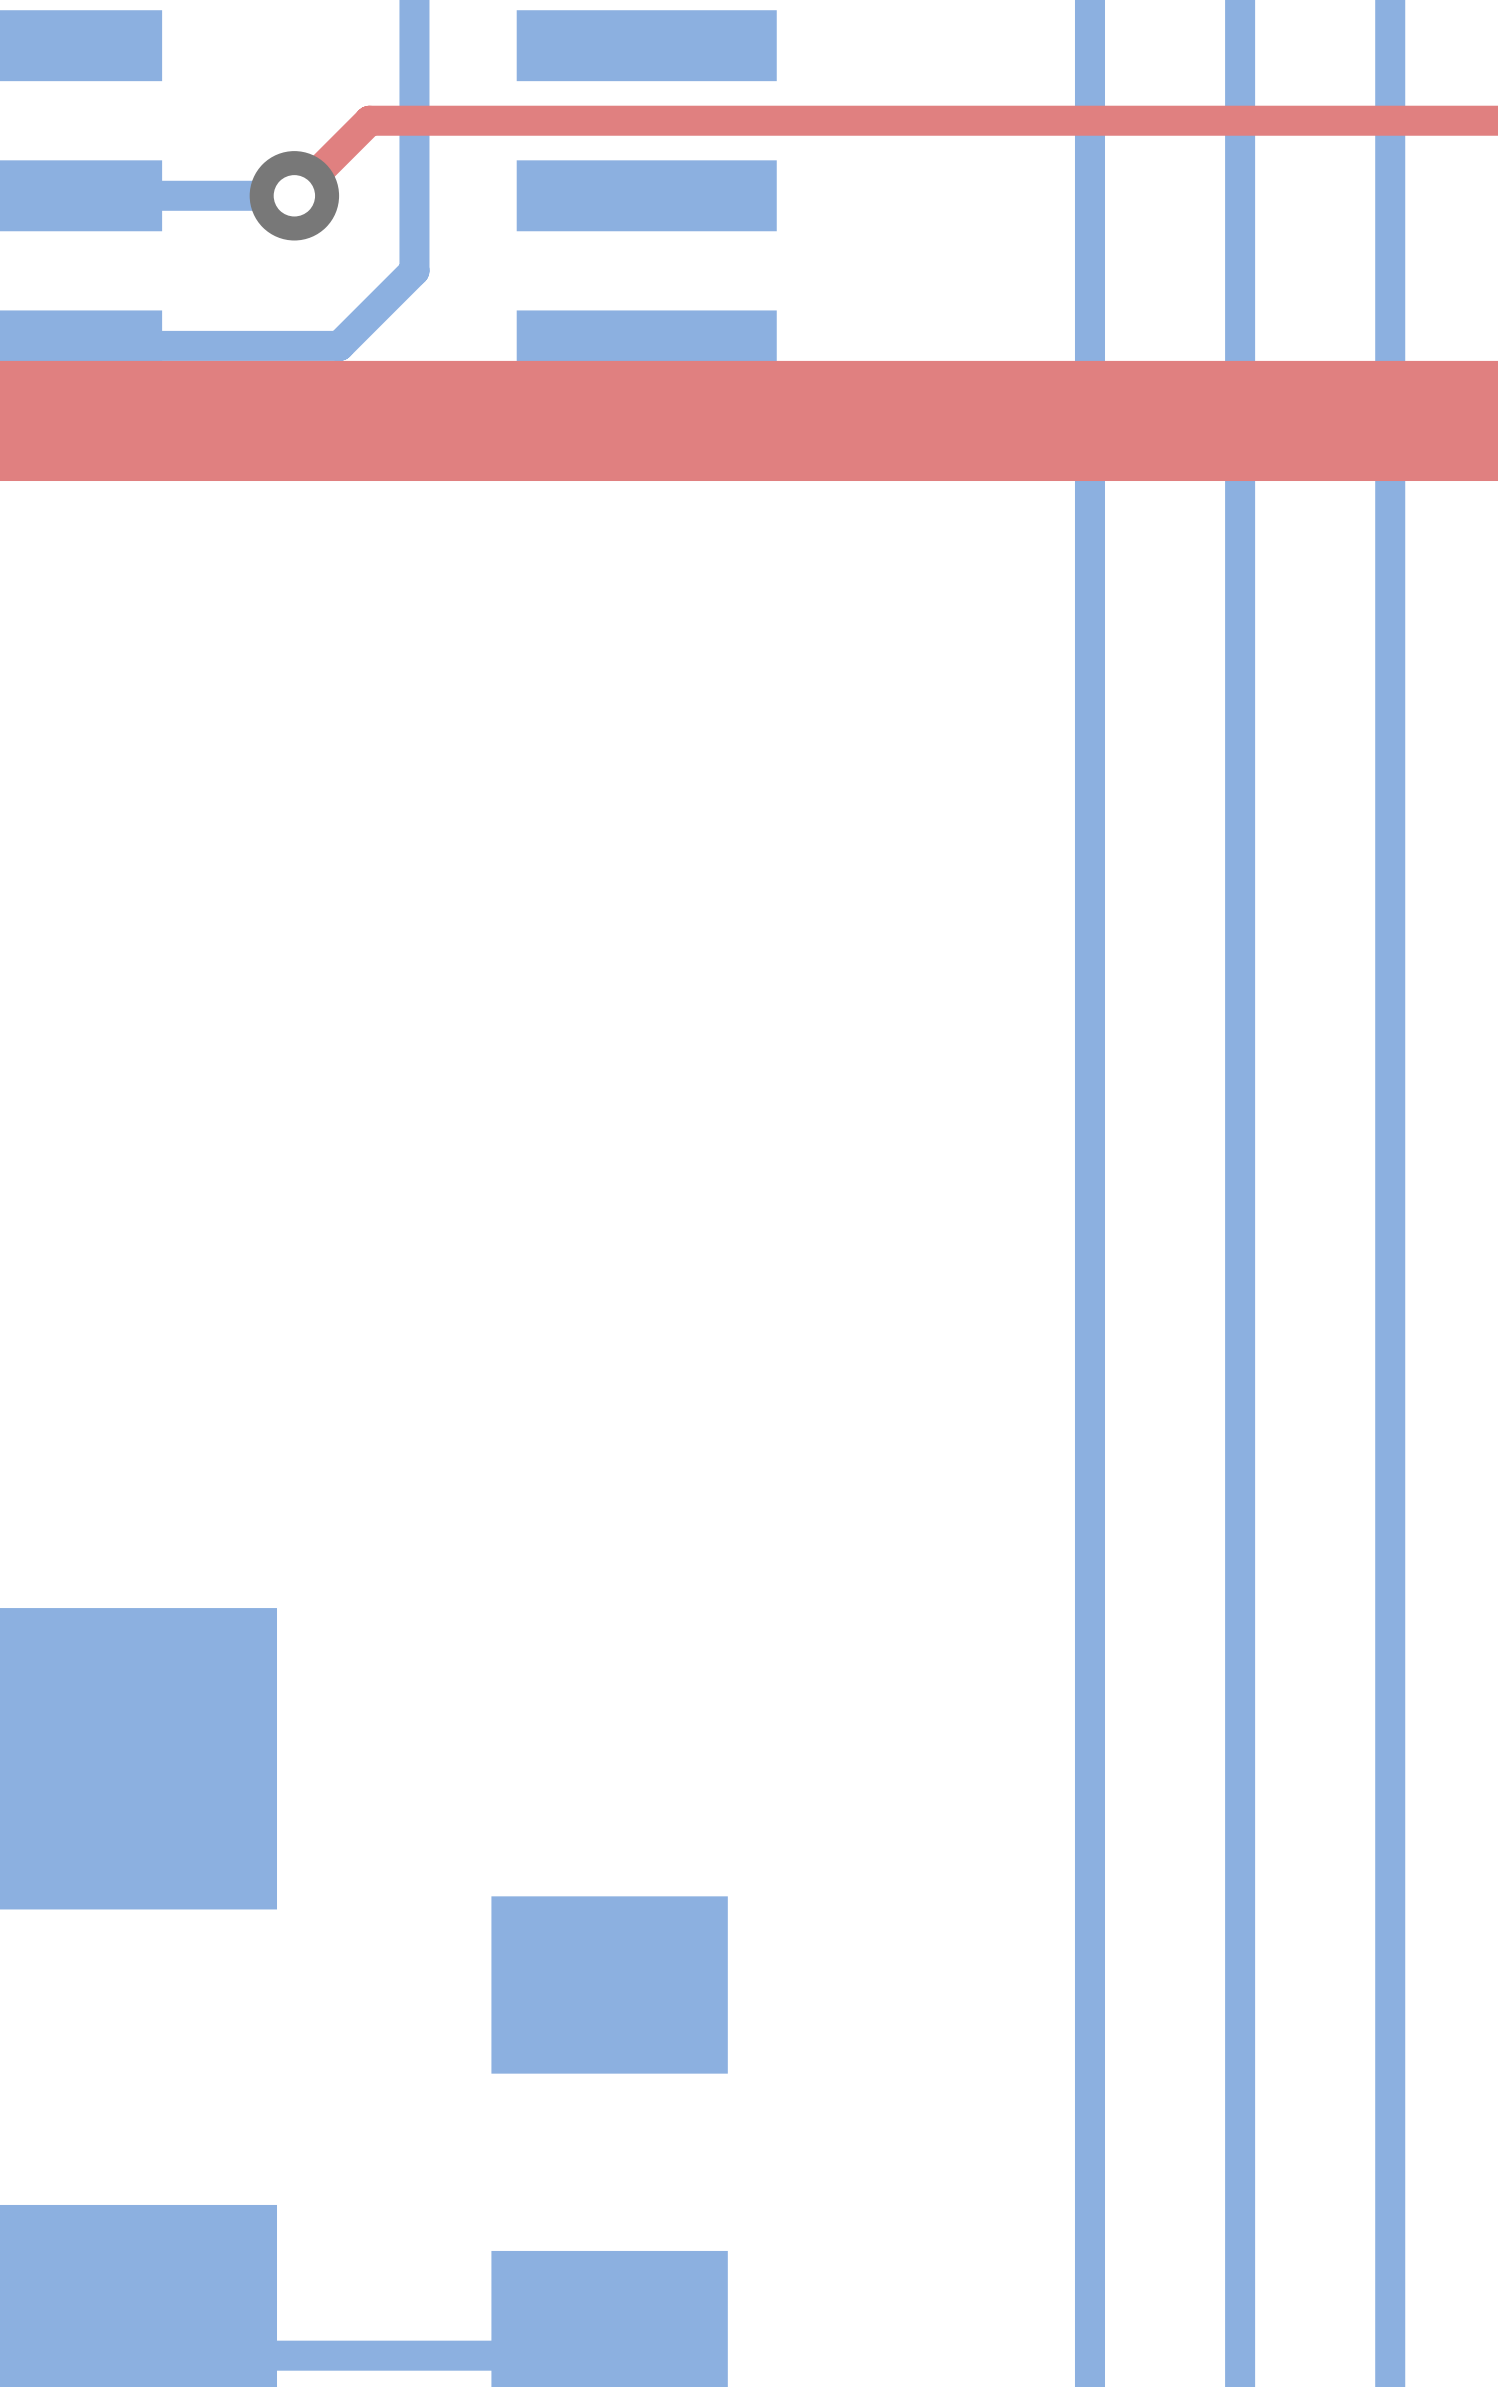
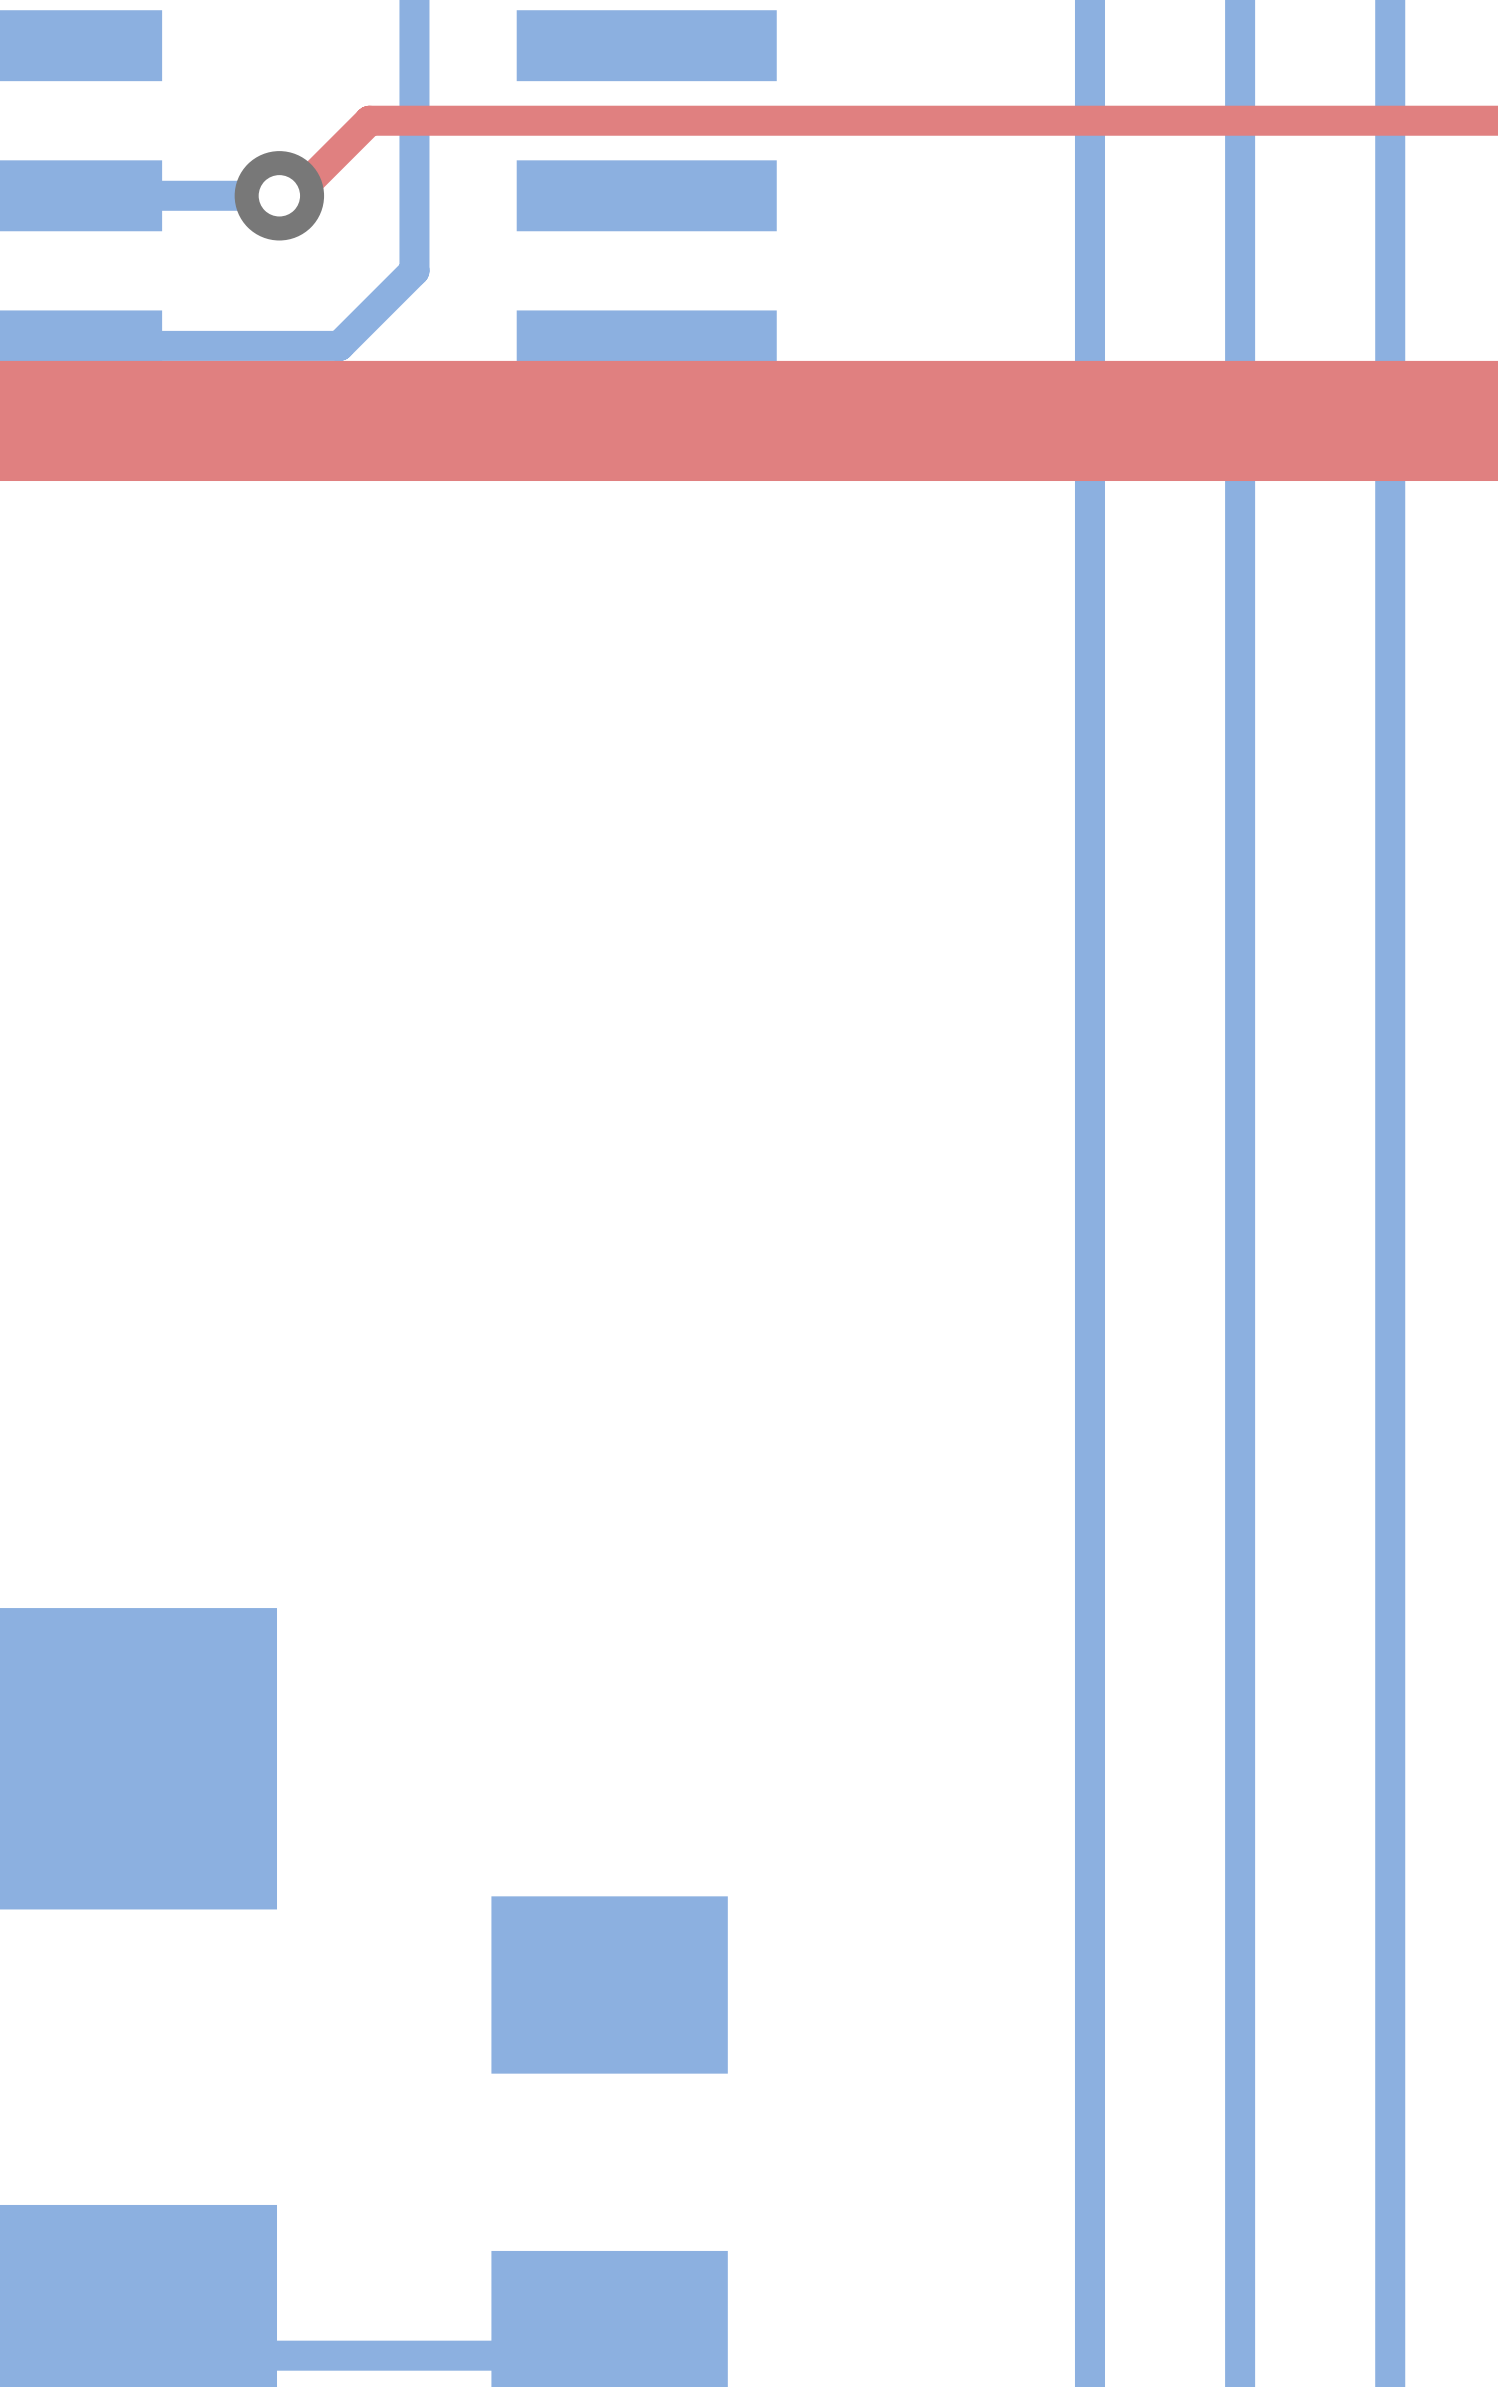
via position: (294, 195) -> (279, 195)

